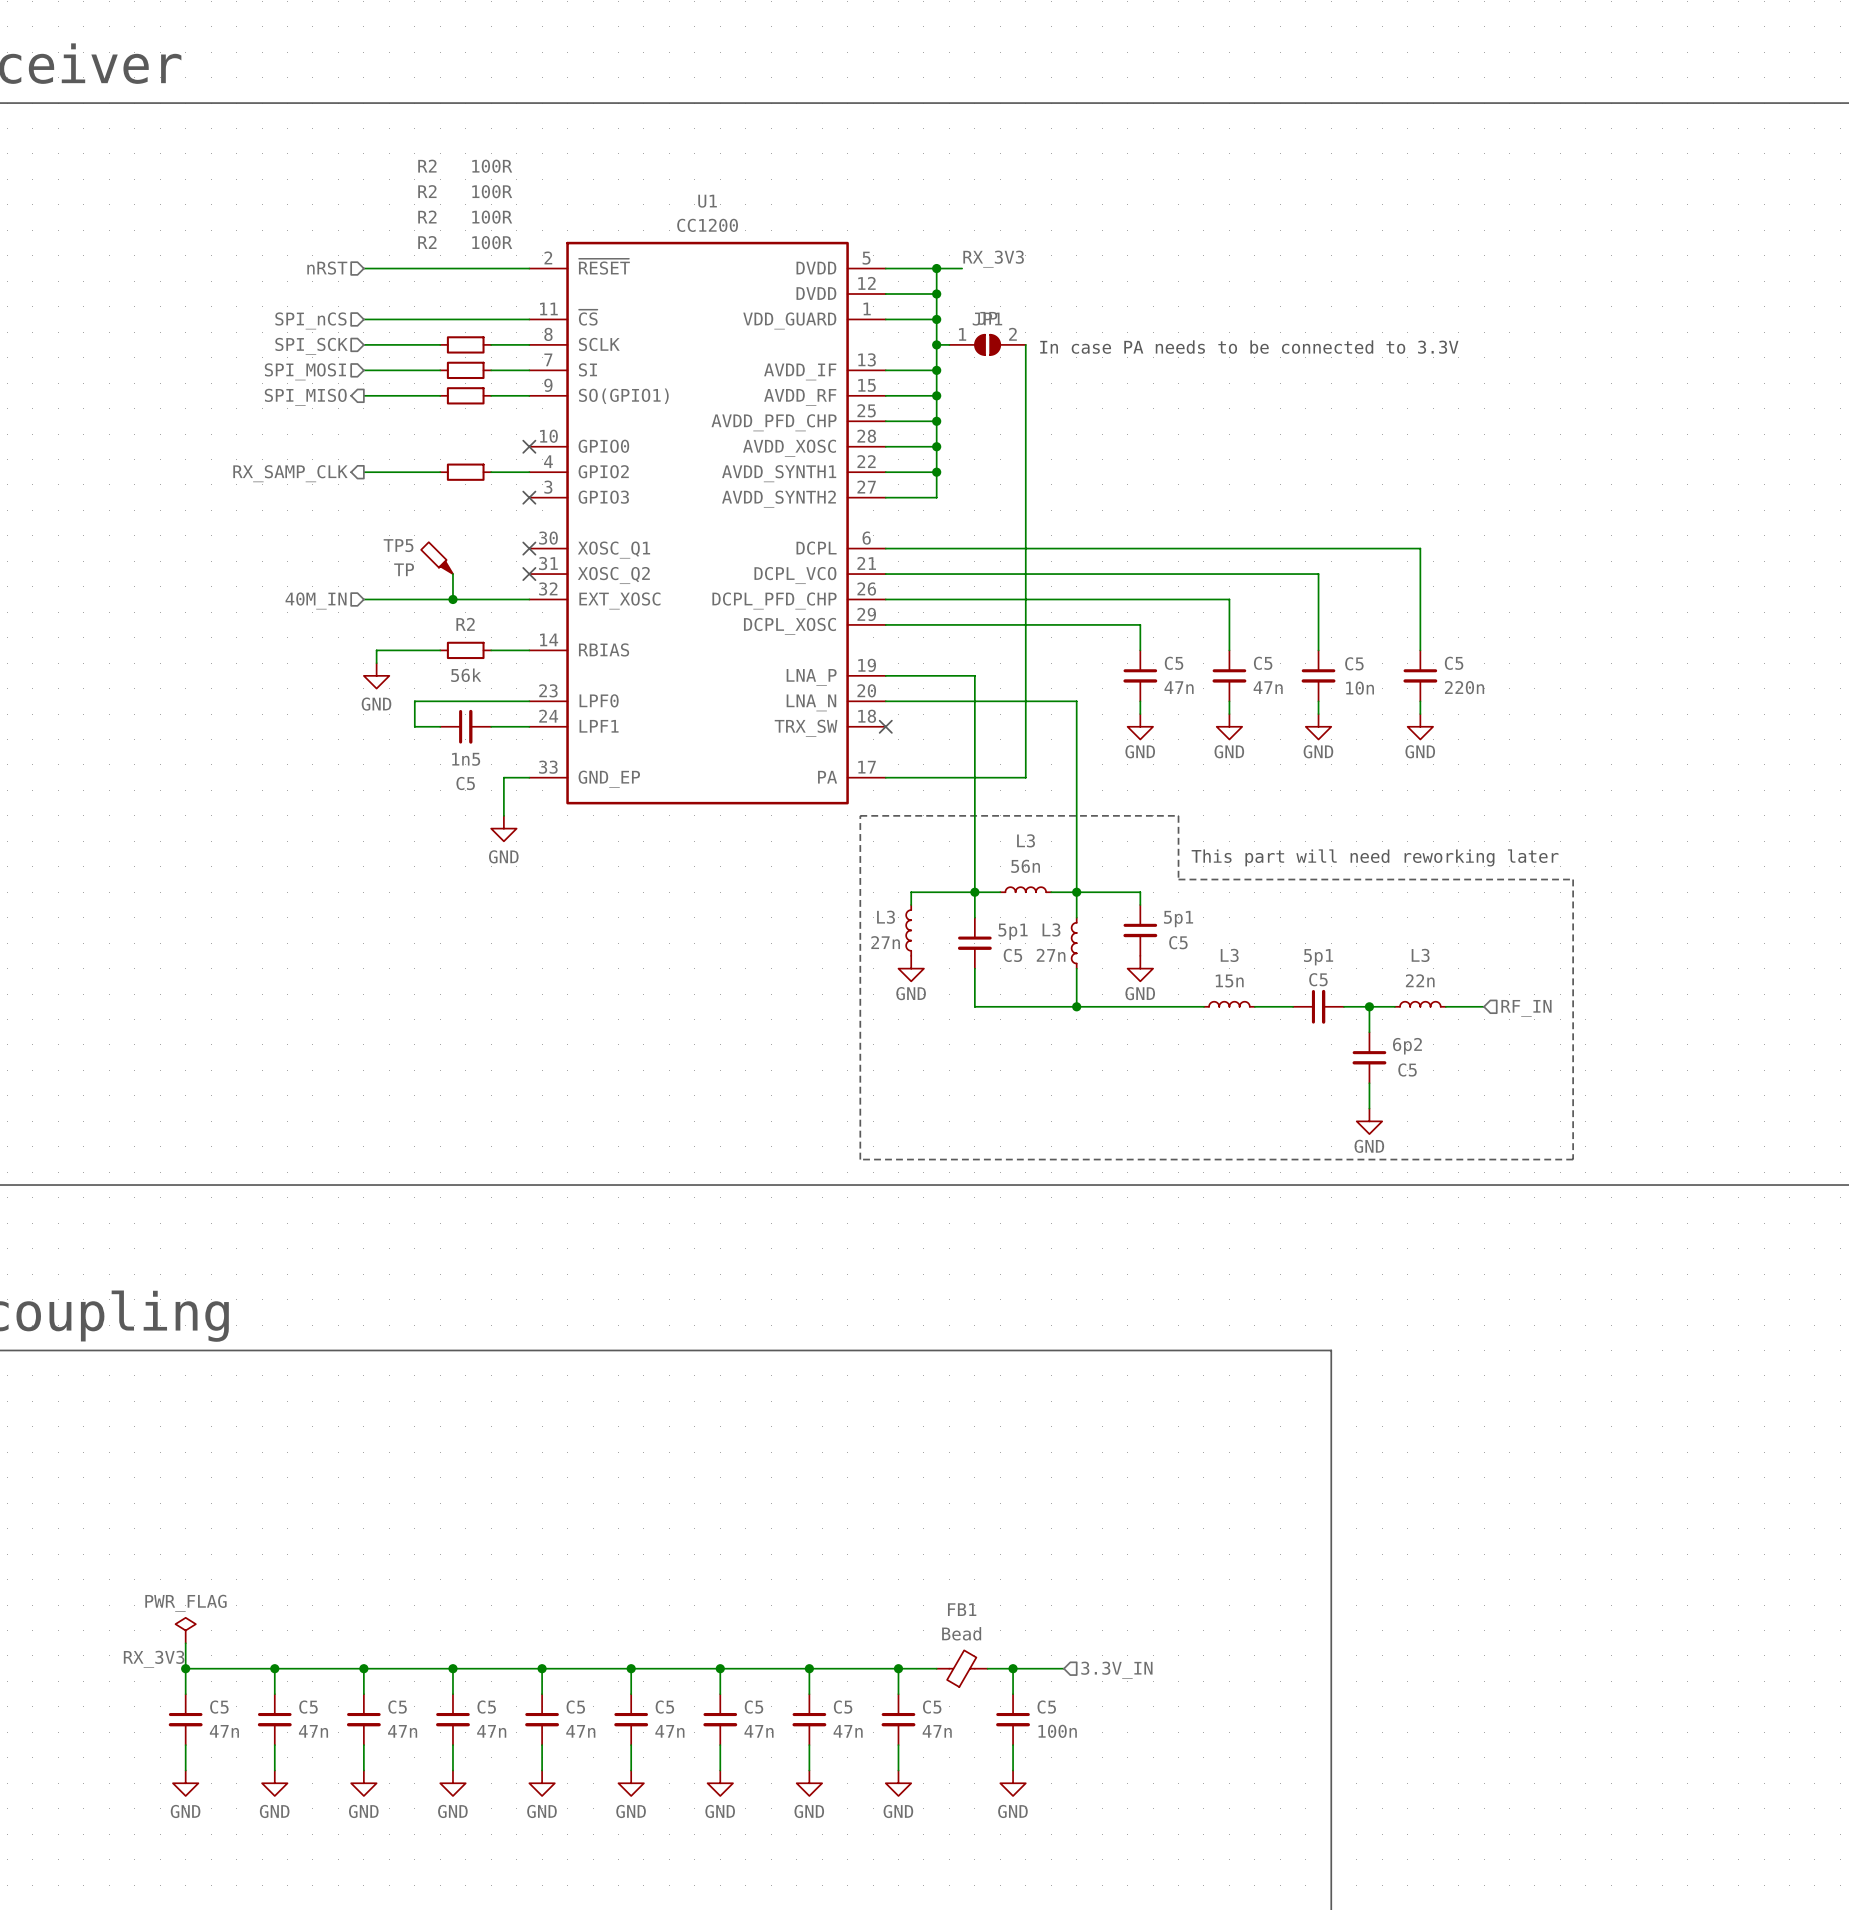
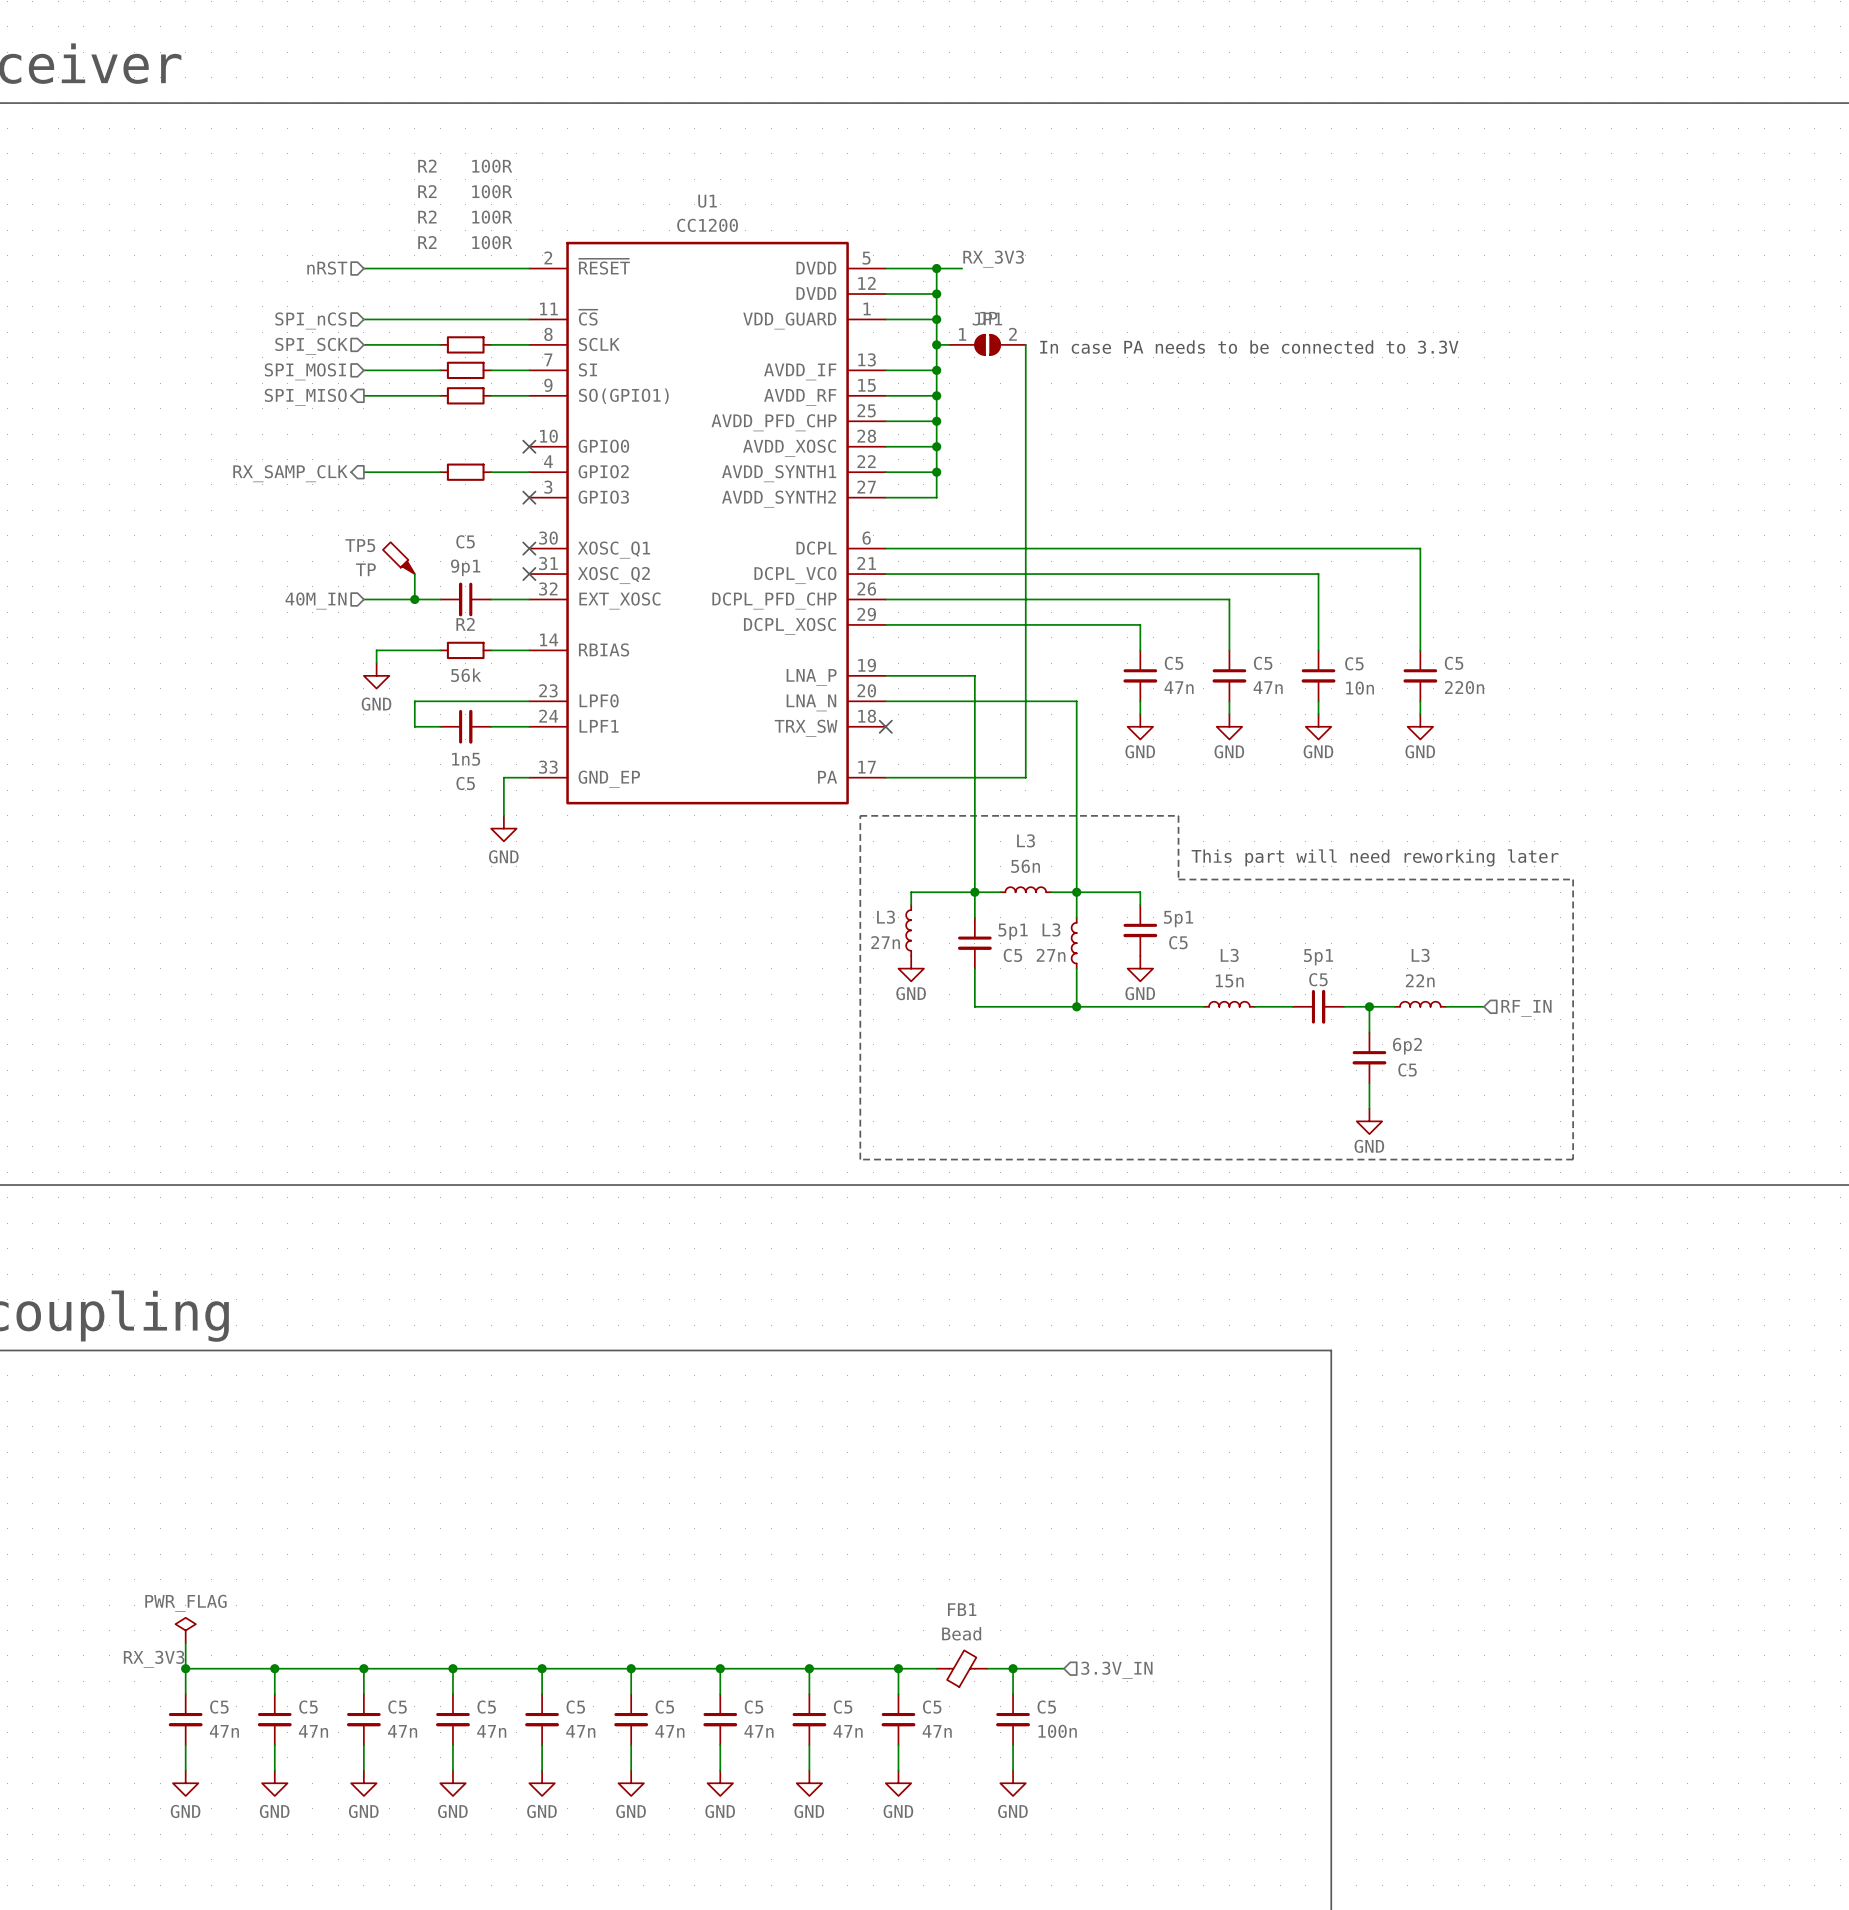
TP5 position: (437, 558) -> (398, 558)
wire: (452, 574) (452, 599) -> (414, 574) (414, 599)
junction position: (452, 599) -> (414, 599)
C5: none -> 9p1 (465, 599)

